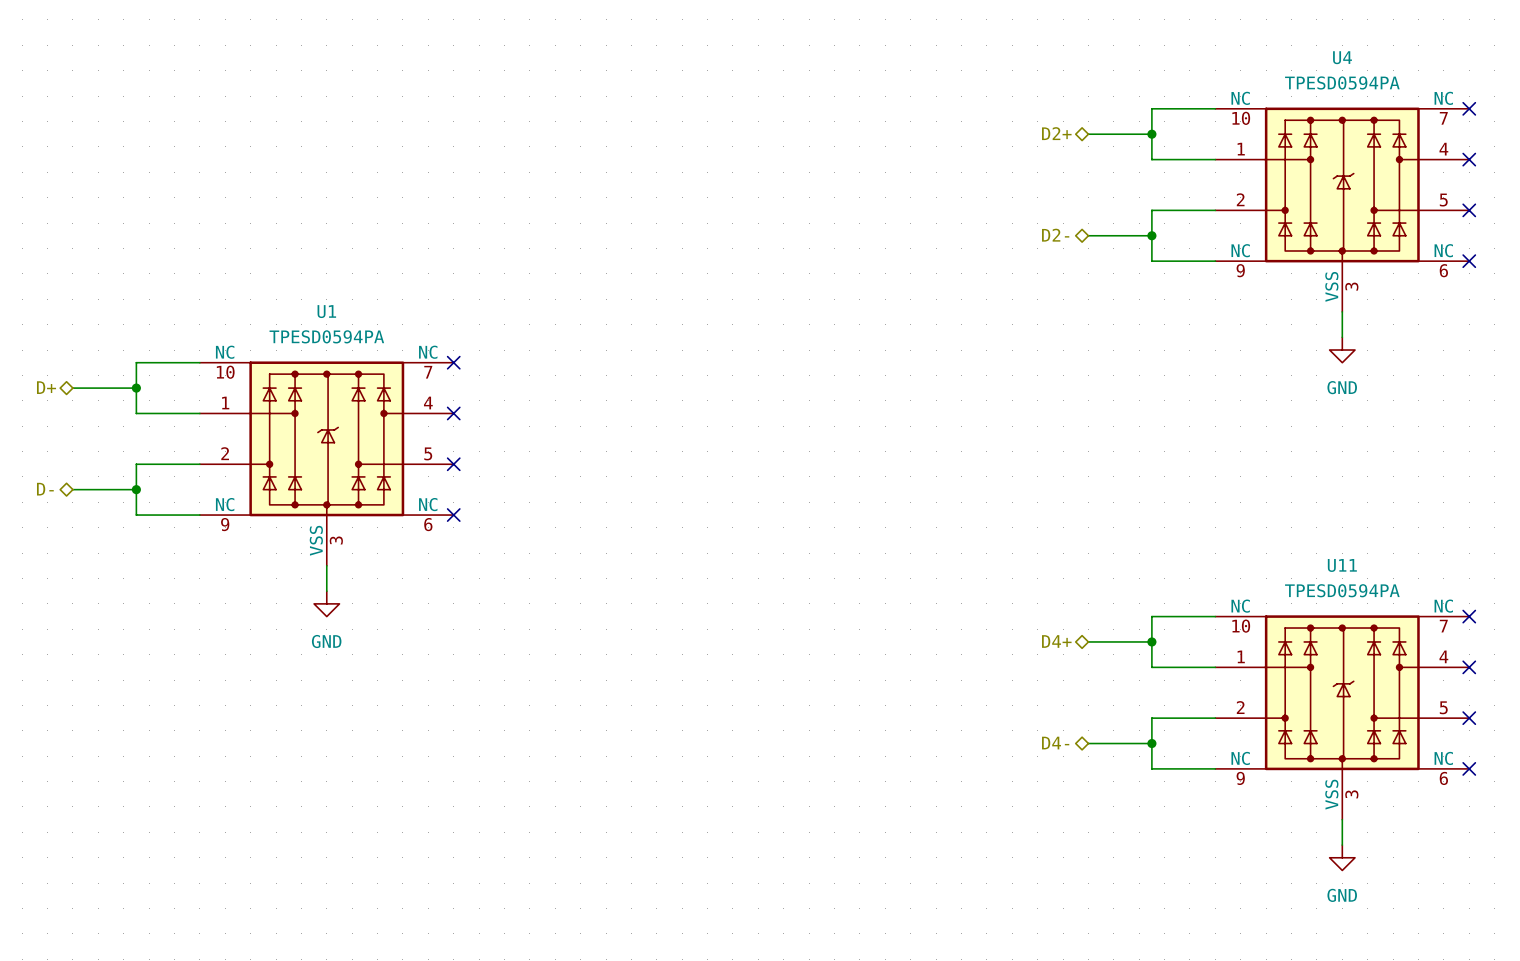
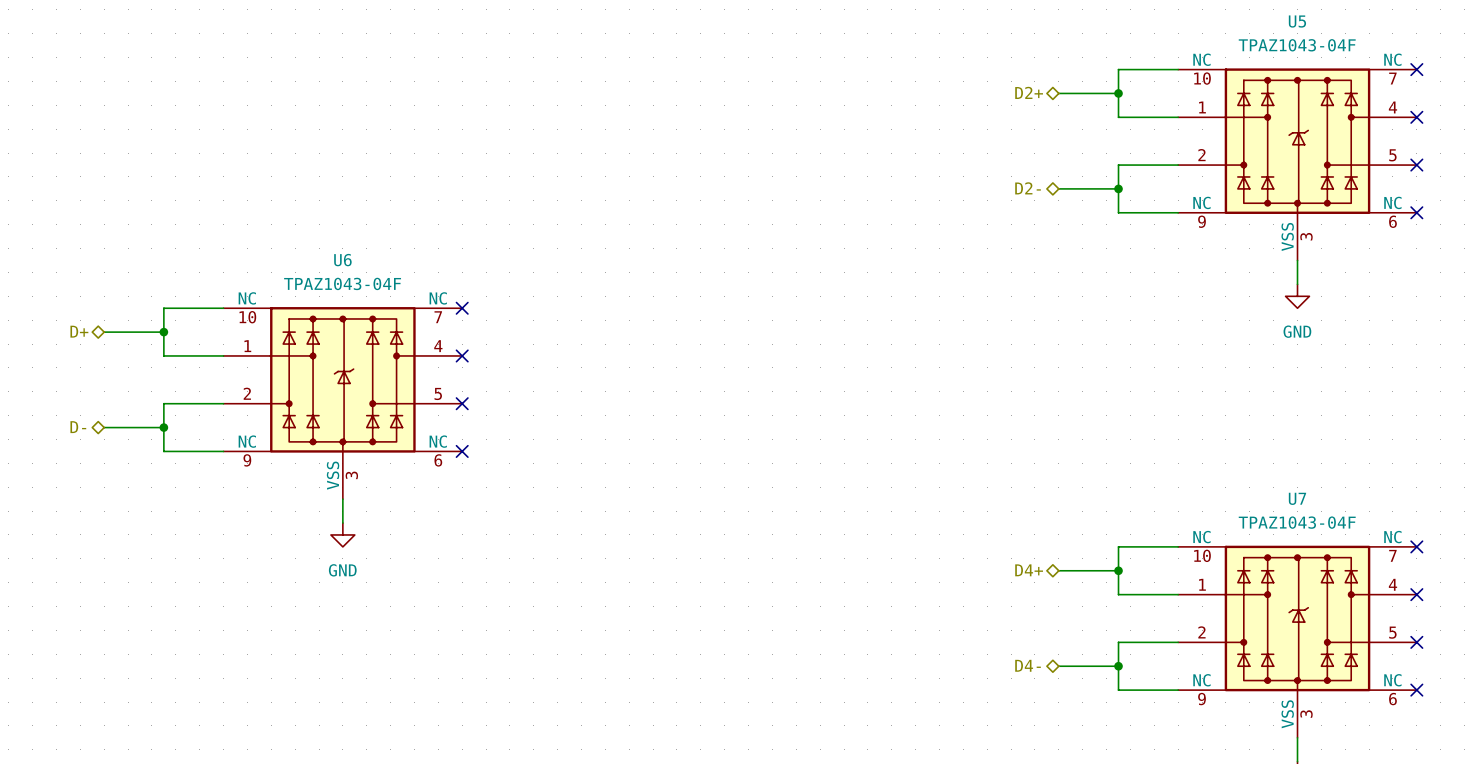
U4 name: U4 (1342, 57) -> U5 (1297, 21)
U4 value: TPESD0594PA (1342, 82) -> TPAZ1043-04F (1297, 45)
U1 name: U1 (326, 311) -> U6 (342, 260)
U1 value: TPESD0594PA (326, 336) -> TPAZ1043-04F (342, 283)
U11 name: U11 (1342, 565) -> U7 (1297, 498)
U11 value: TPESD0594PA (1342, 590) -> TPAZ1043-04F (1297, 522)

